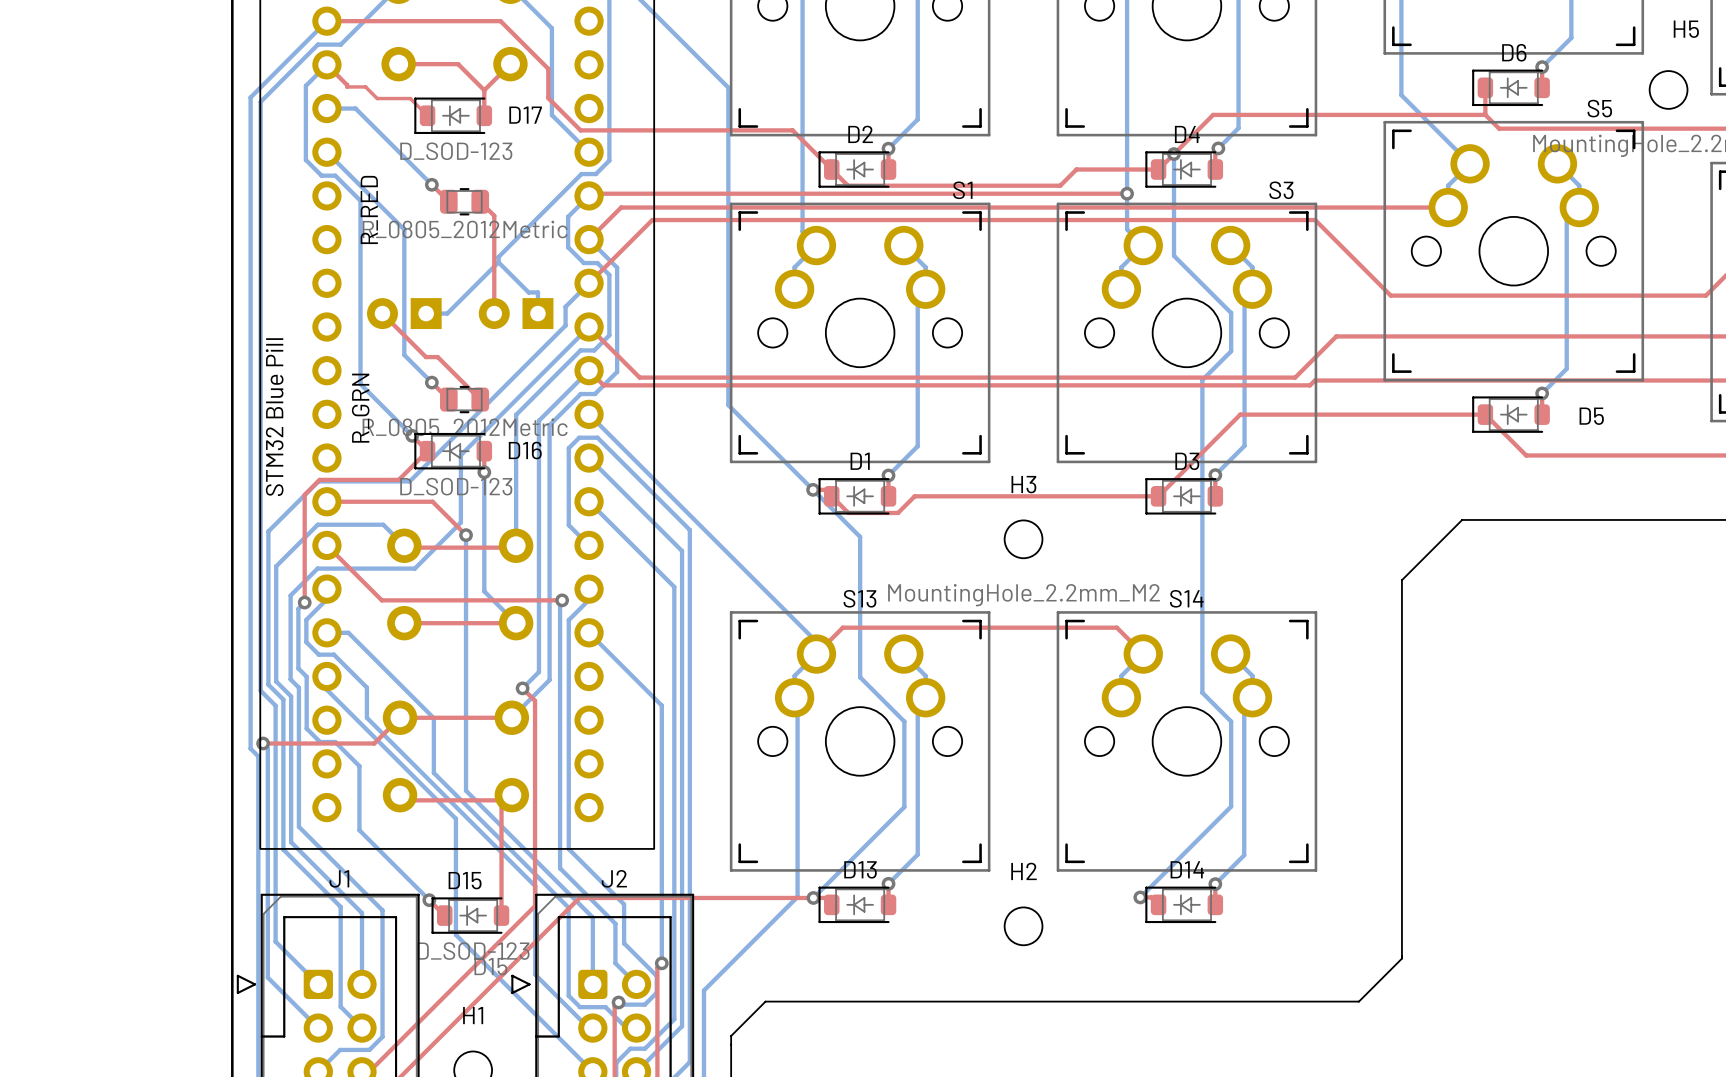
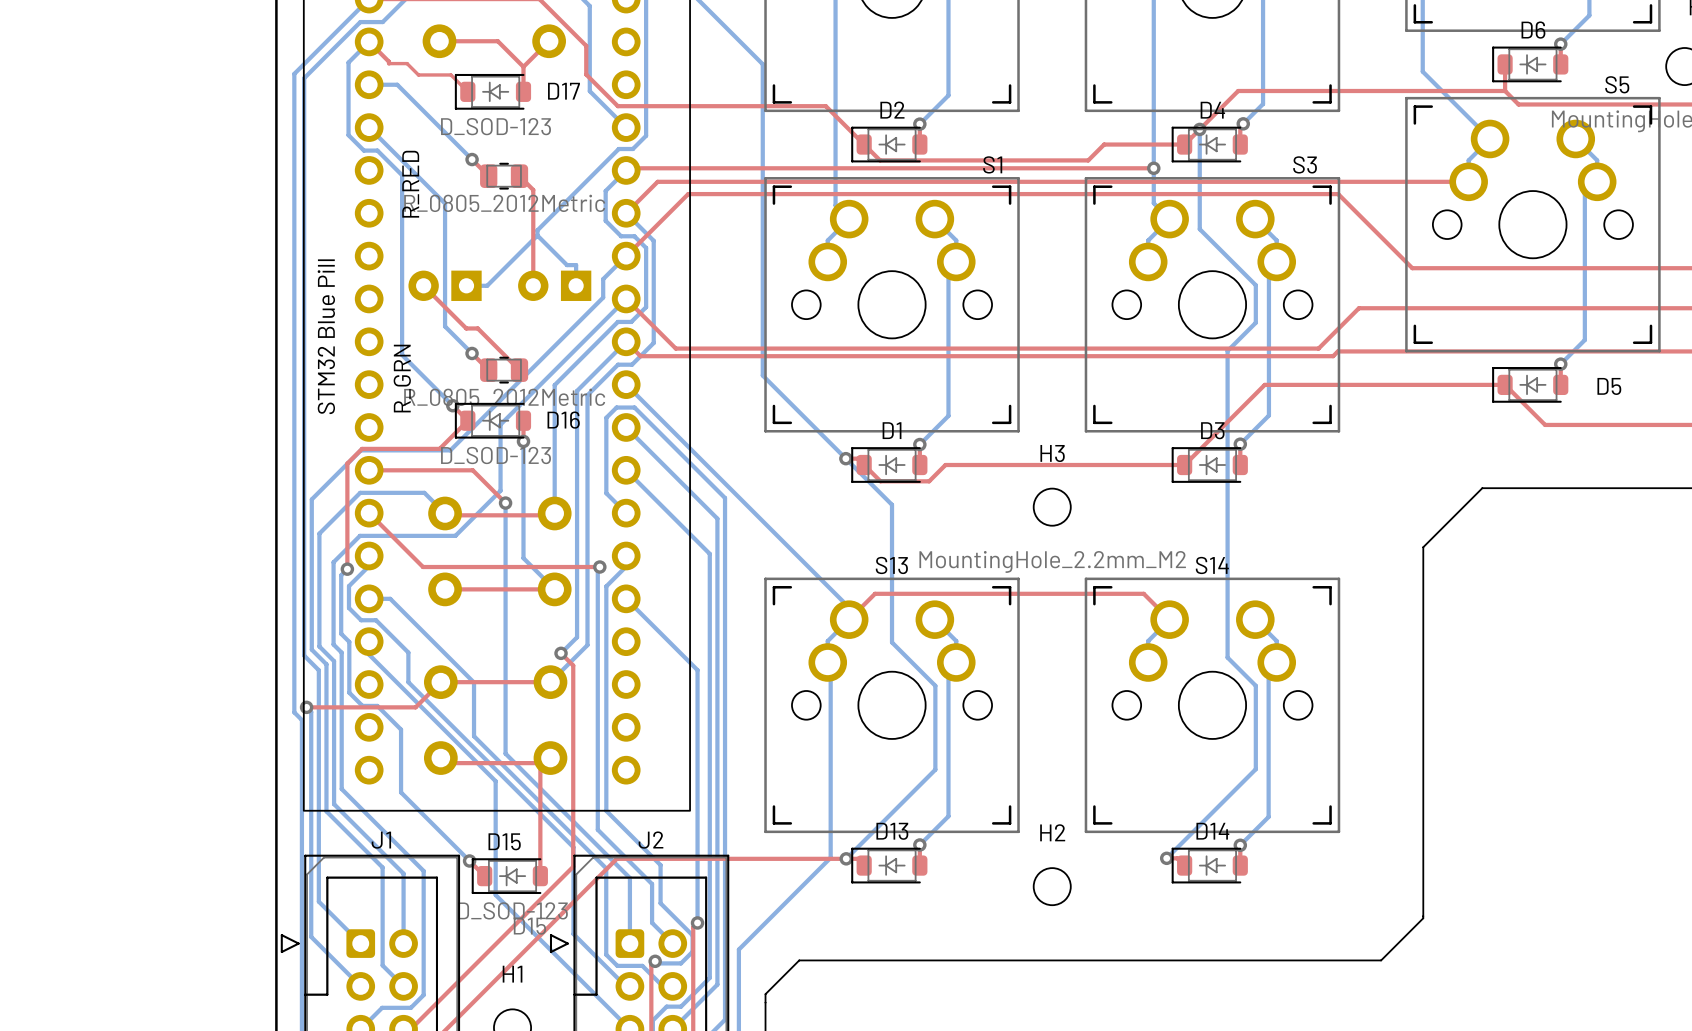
STM32 Blue Pill name position: STM32 Blue Pill (274, 417) -> STM32 Blue Pill (326, 336)

